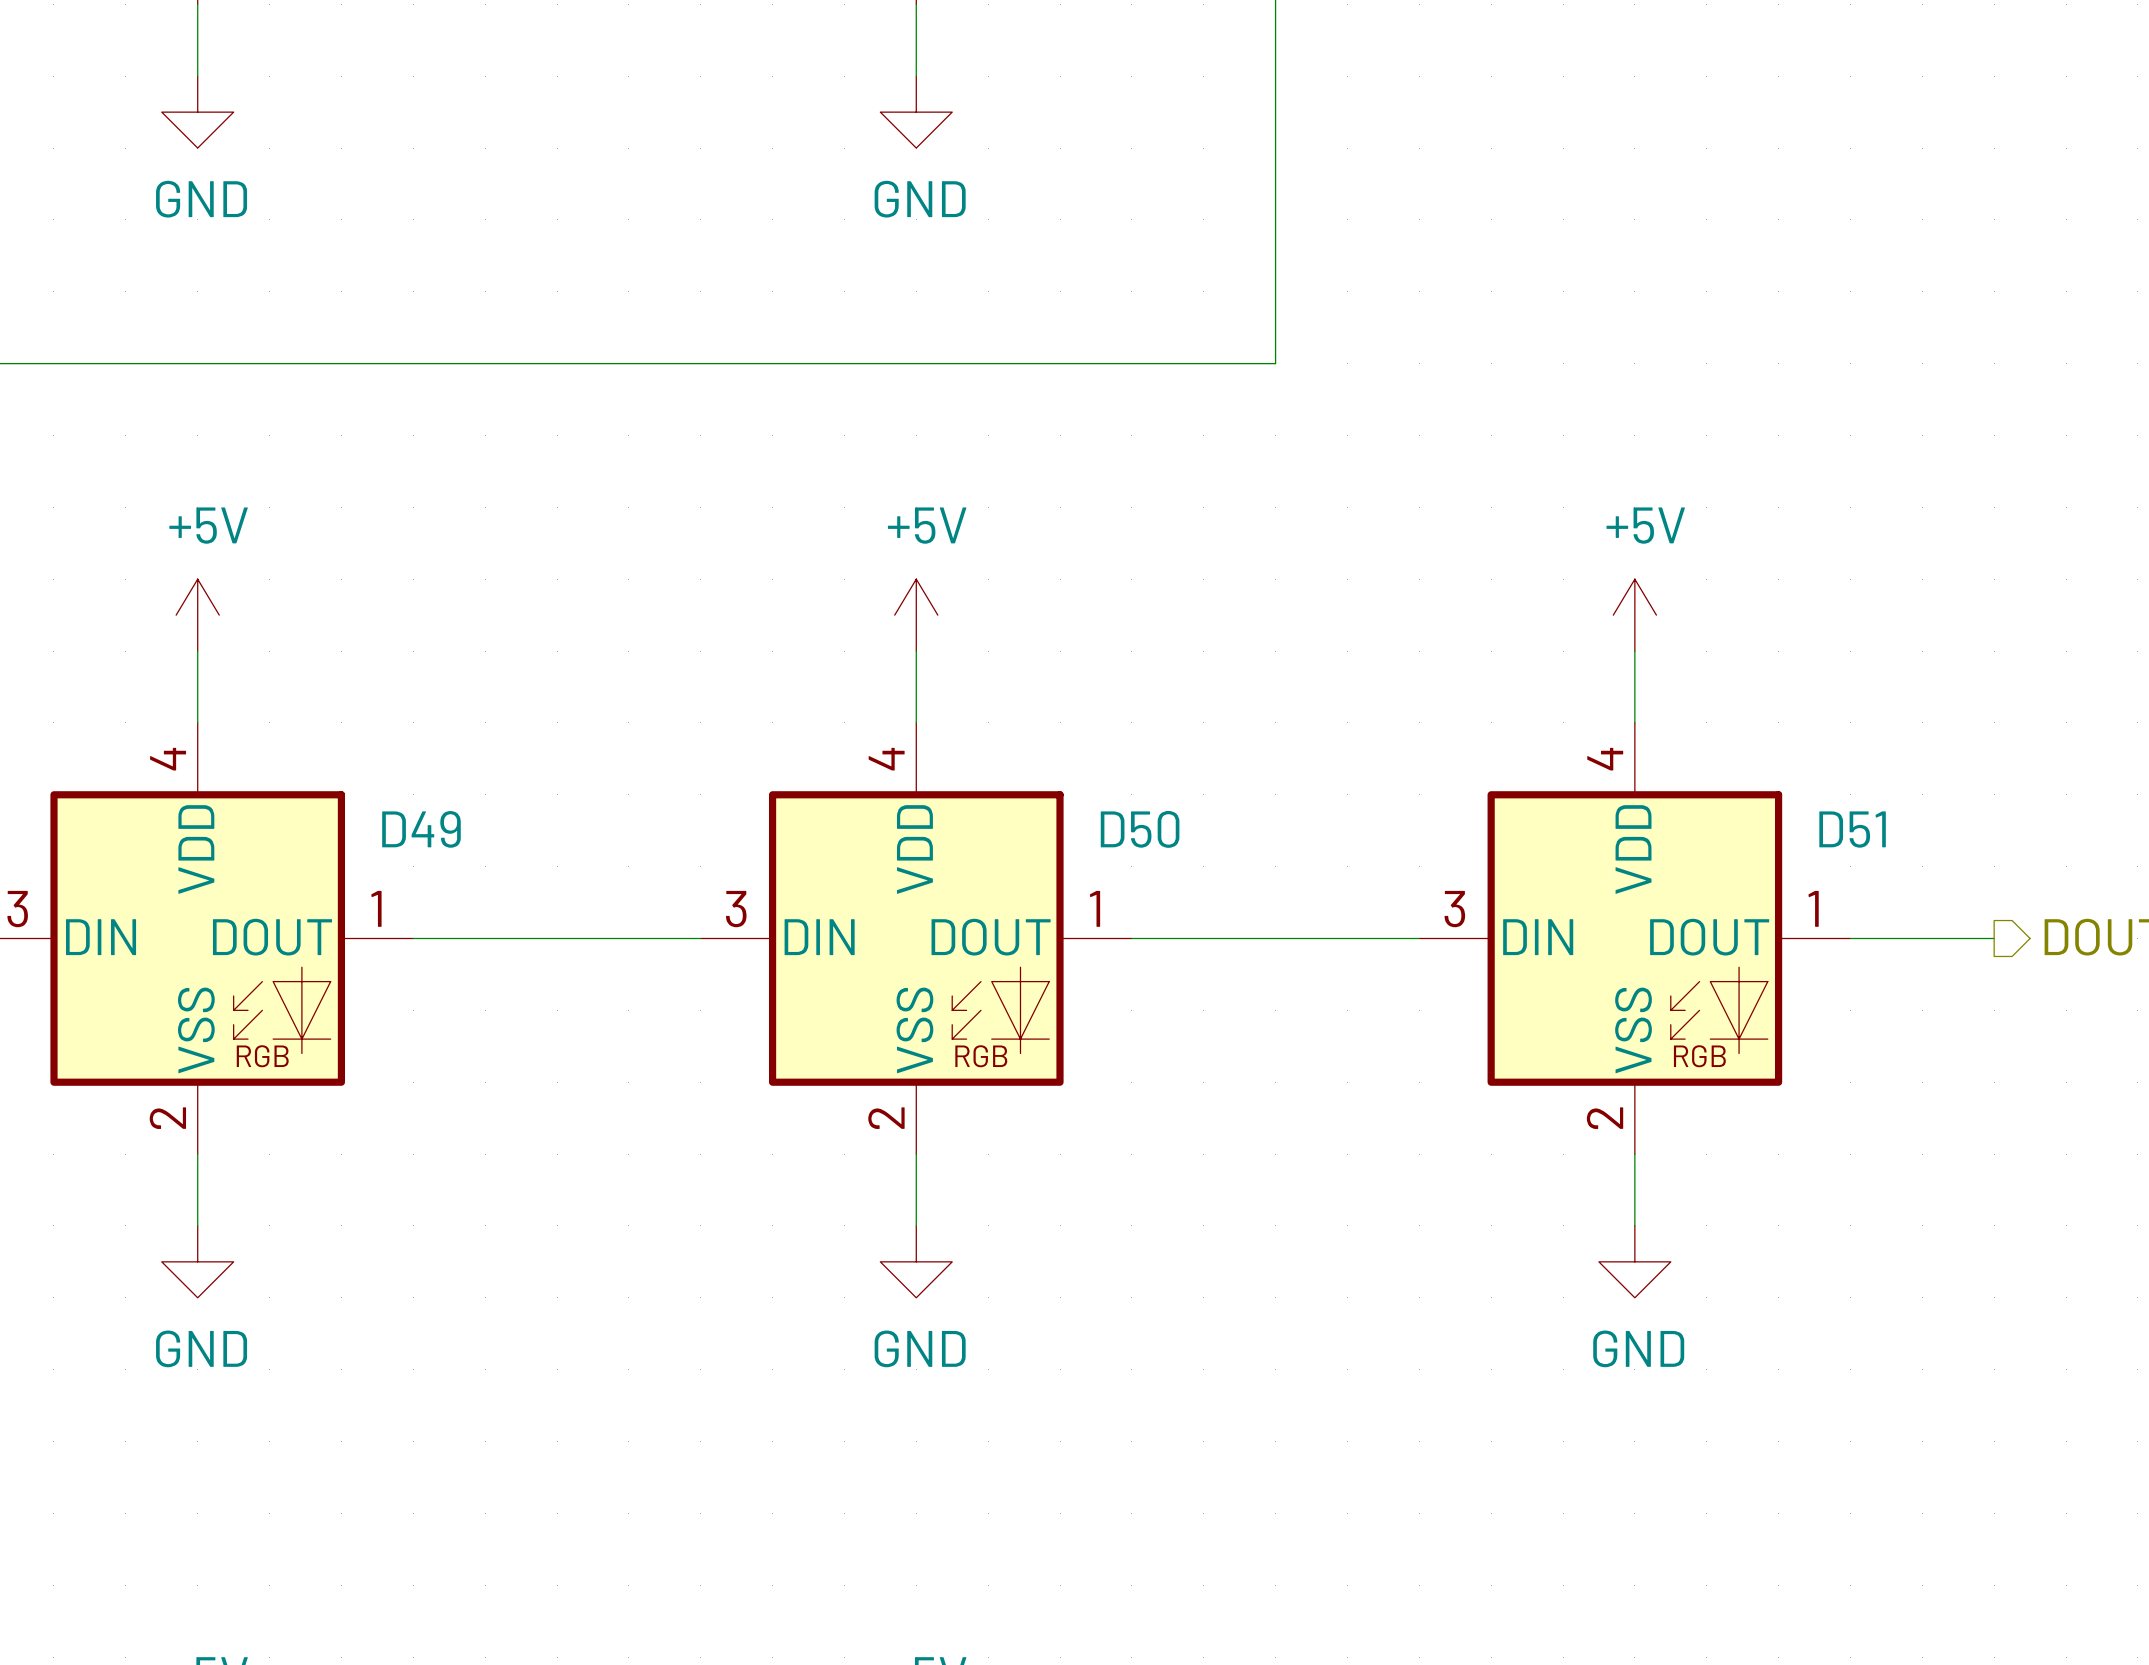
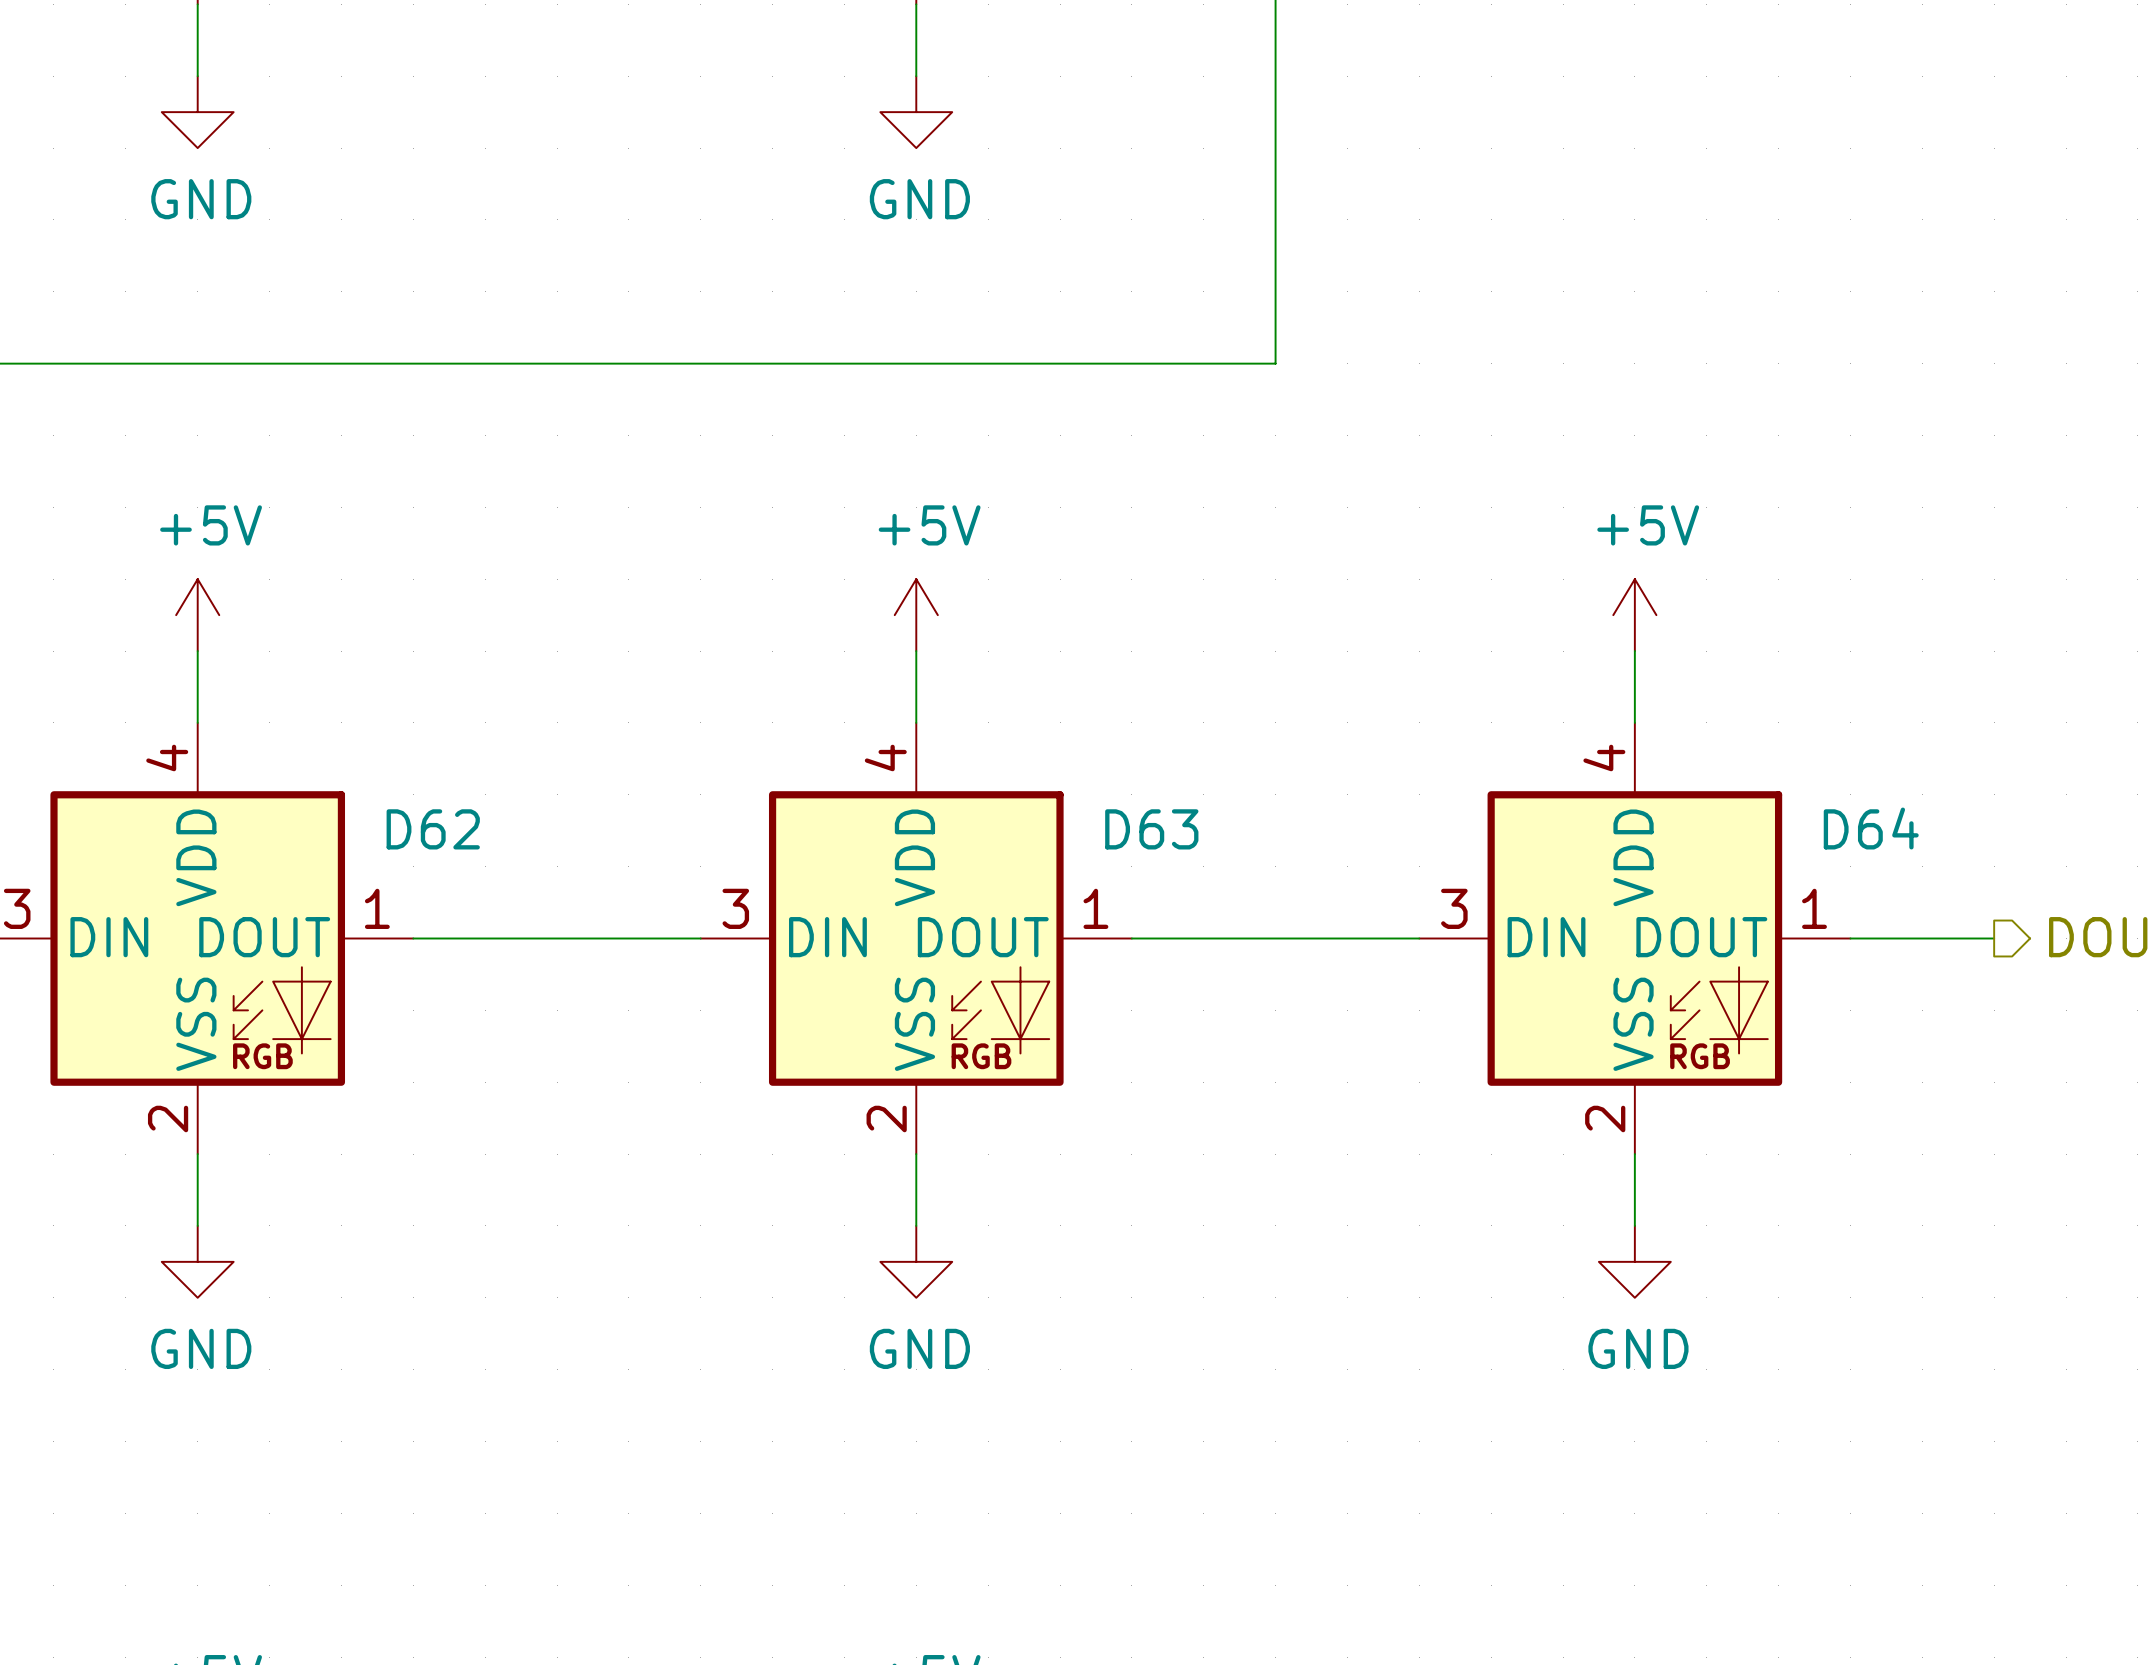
D49 name: D49 (421, 829) -> D62 (433, 829)
D50 name: D50 (1140, 829) -> D63 (1151, 829)
D51 name: D51 (1852, 829) -> D64 (1871, 828)

